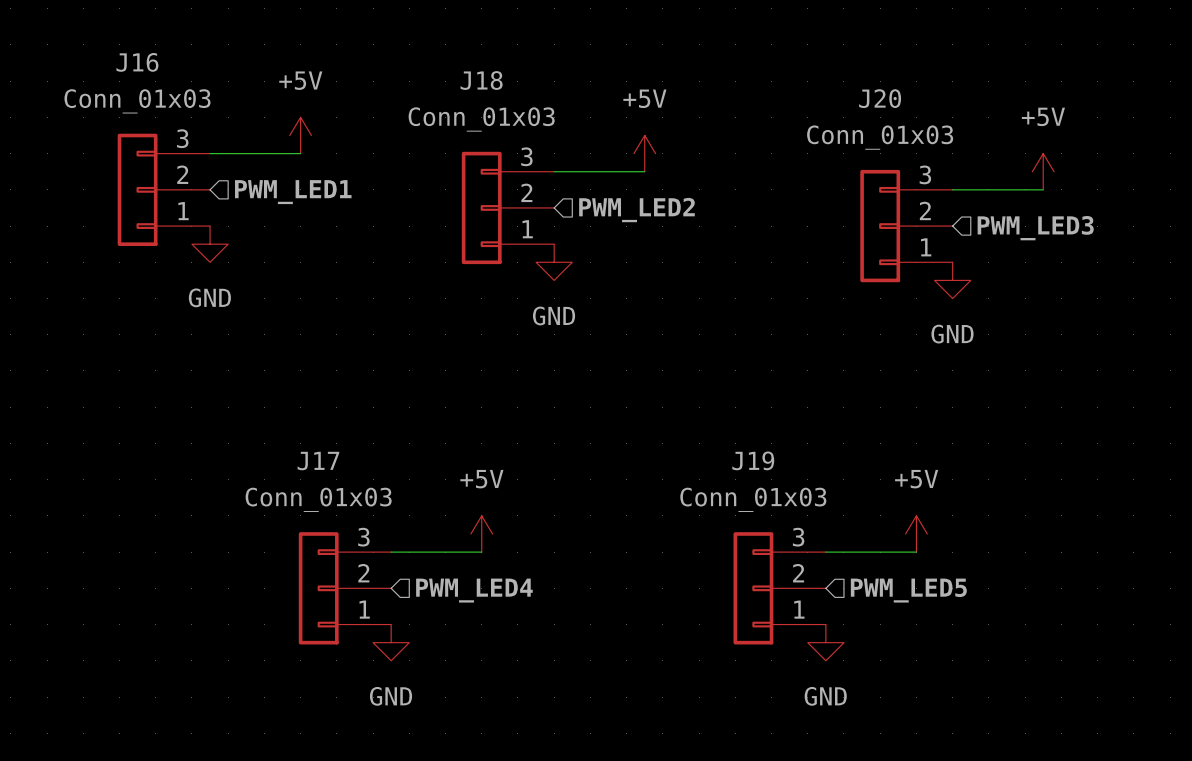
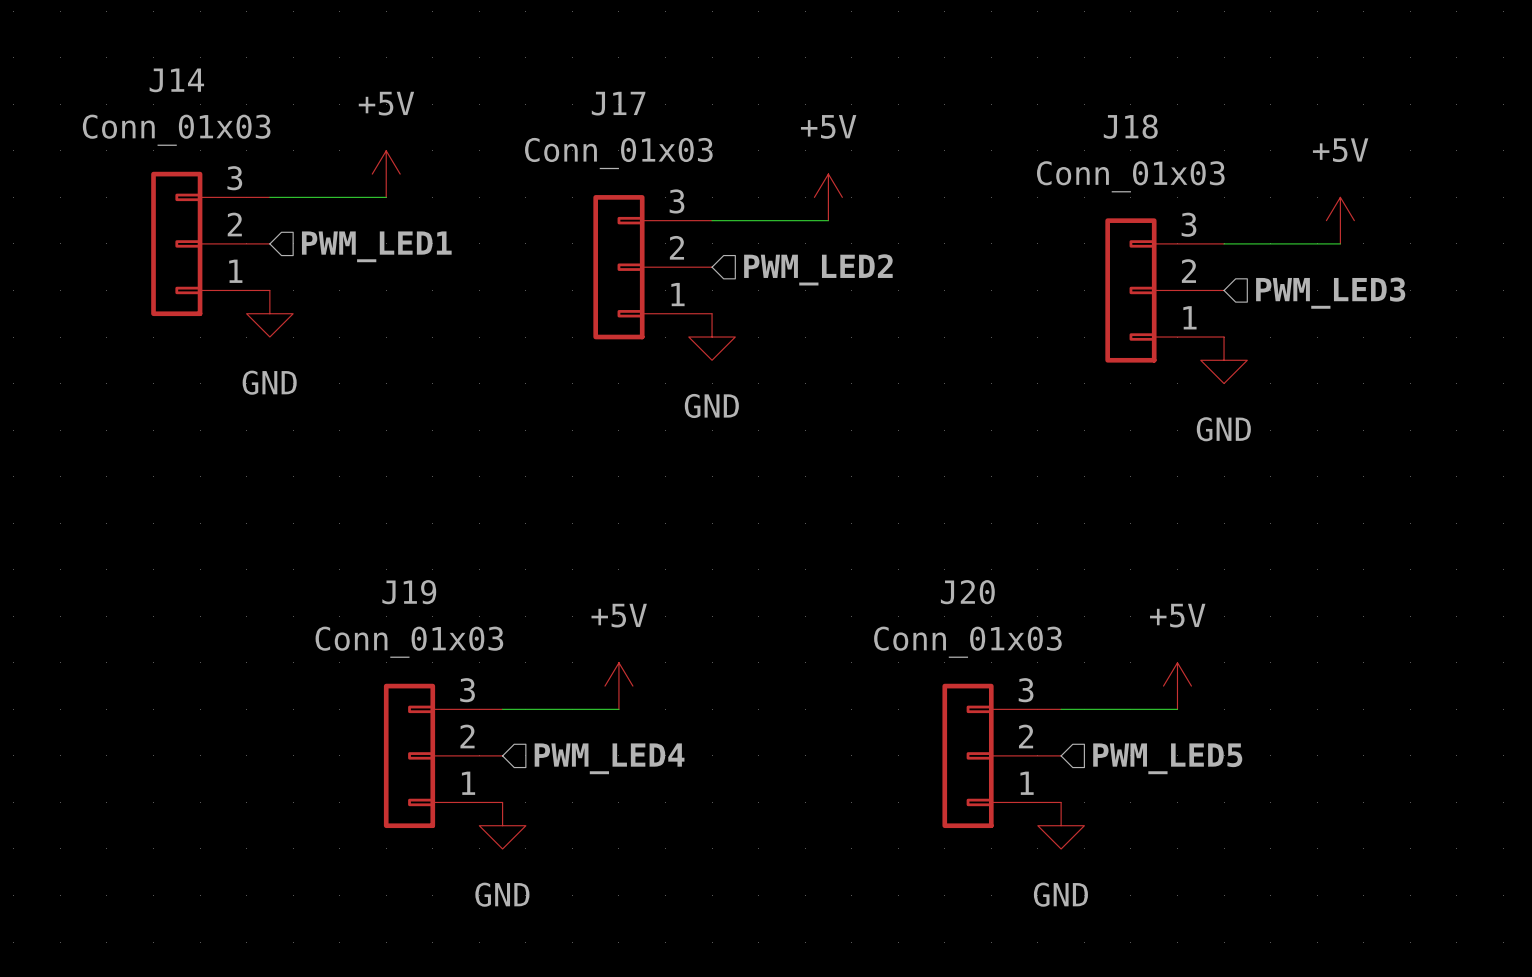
J16 name: J16 (137, 62) -> J14 (176, 80)
J18 name: J18 (481, 80) -> J17 (618, 103)
J20 name: J20 (880, 98) -> J18 (1130, 126)
J19 name: J19 (753, 460) -> J20 (967, 592)
J17 name: J17 (318, 461) -> J19 (409, 592)

